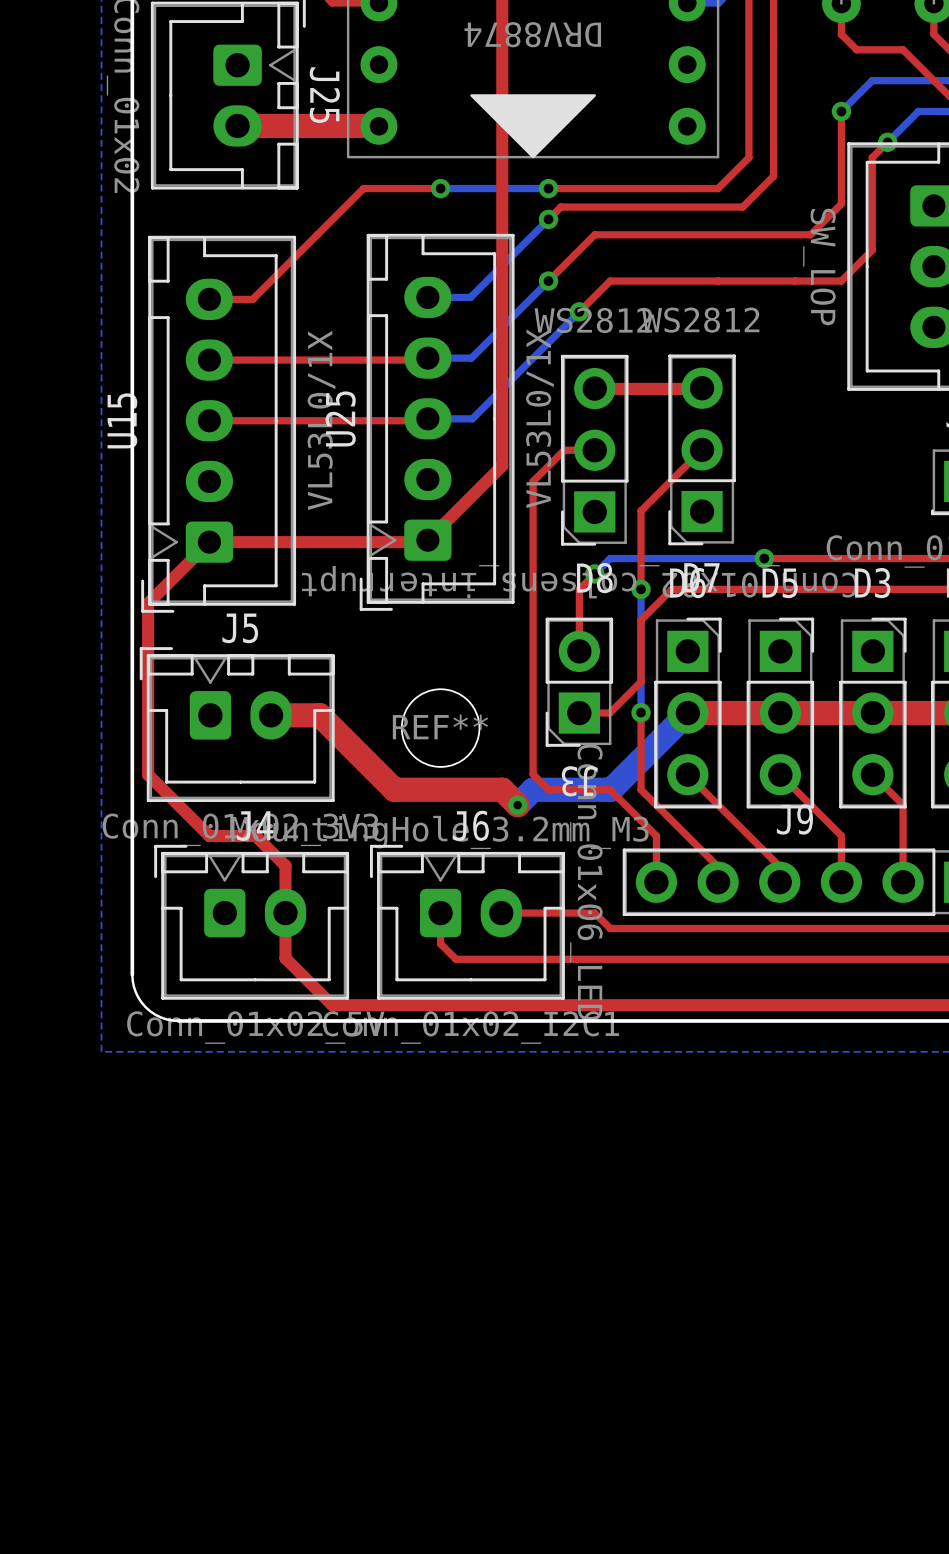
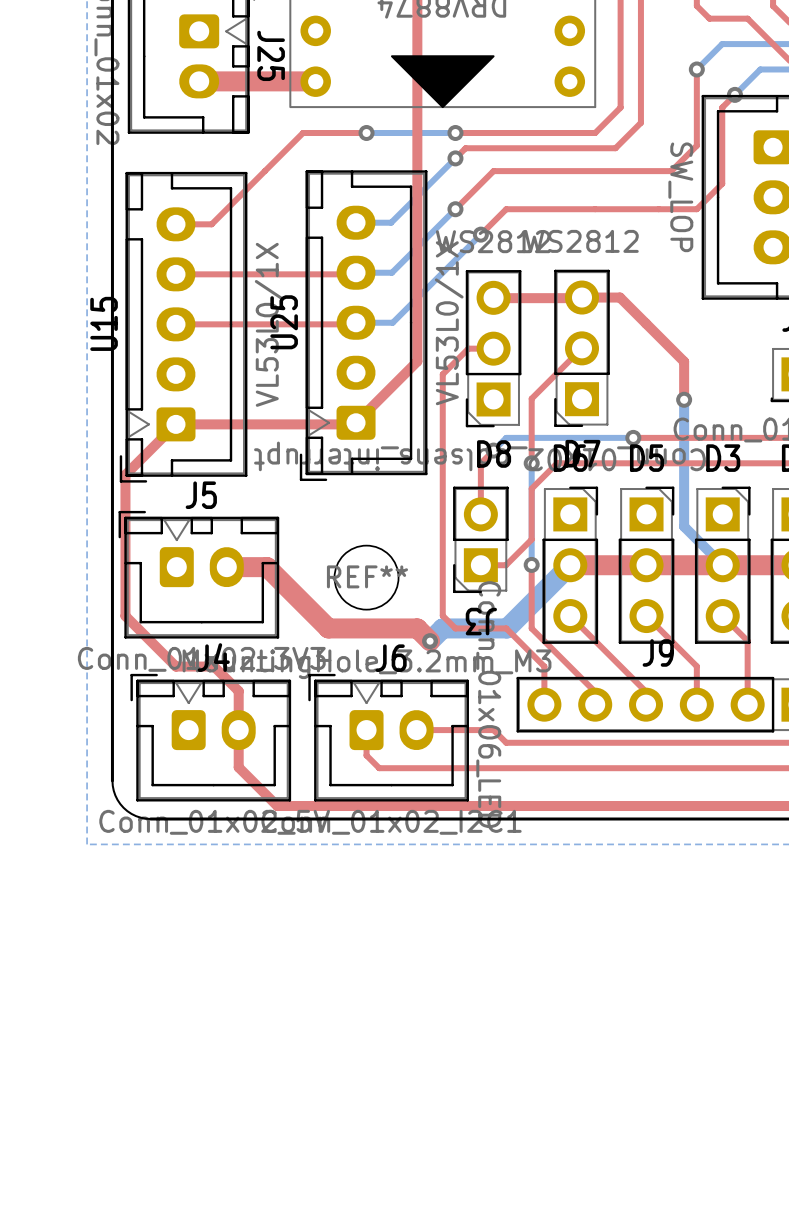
top track: none -> (582, 297) (620, 297) (684, 361) (684, 399)
bottom track: none -> (684, 399) (684, 526) (722, 565)
via: none -> (684, 399)

